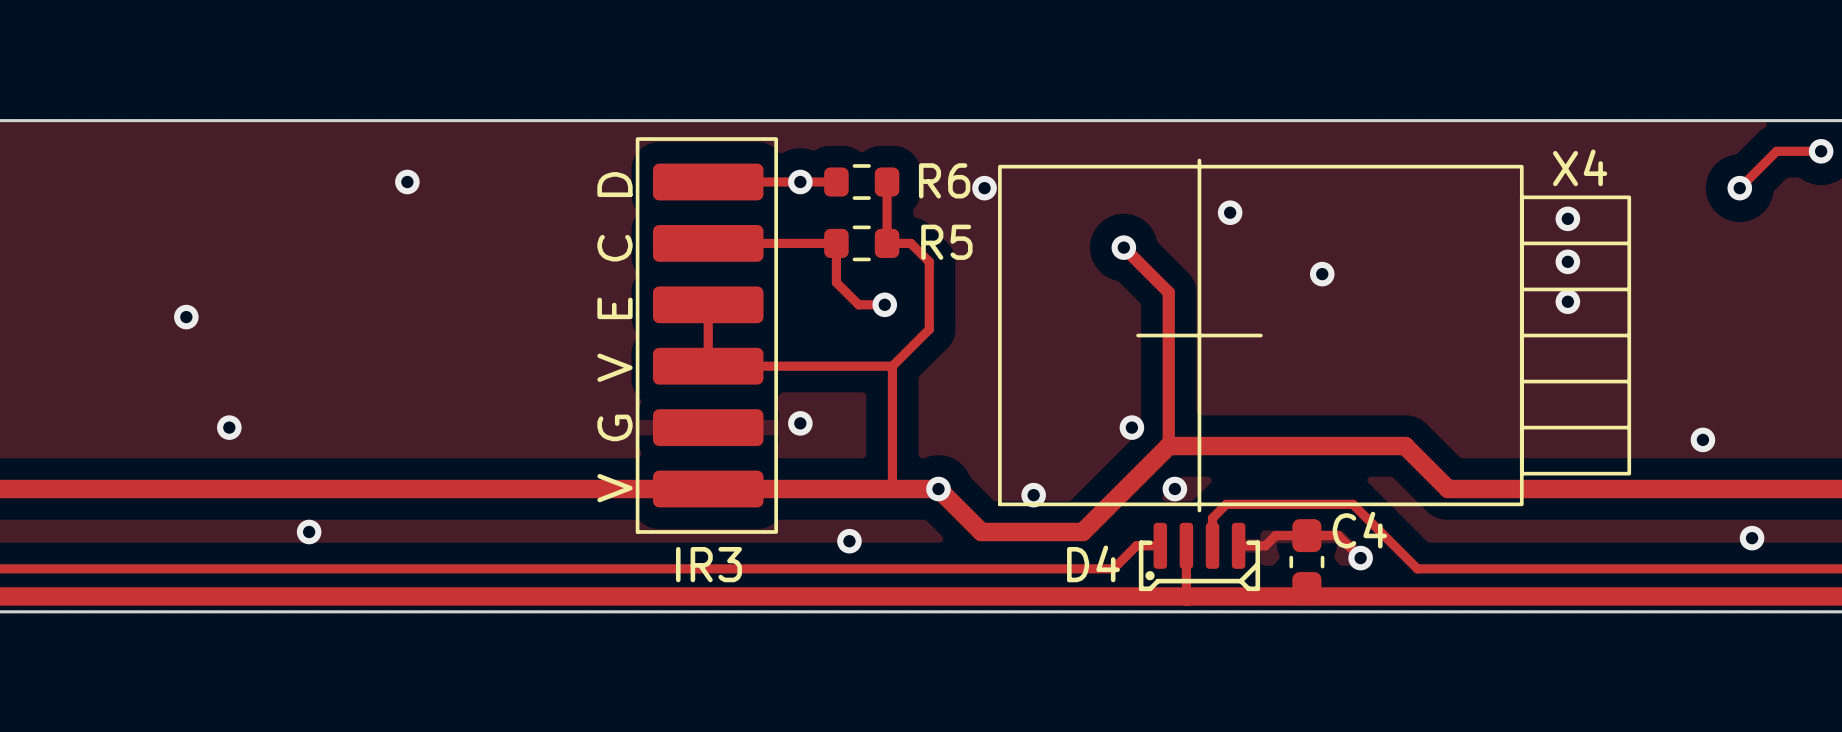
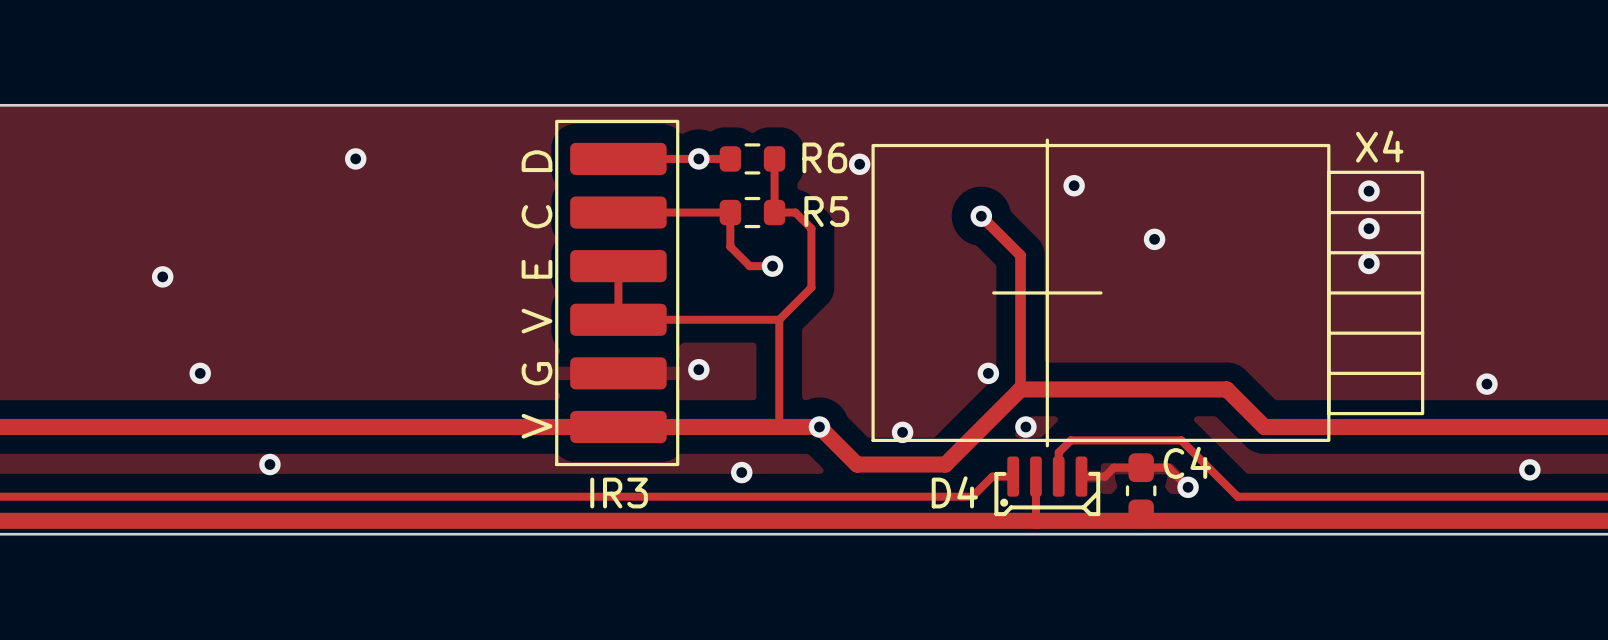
track: (1821, 151) (1776, 151) (1739, 188) -> none
via: (1821, 151) -> none
via: (1739, 188) -> none

